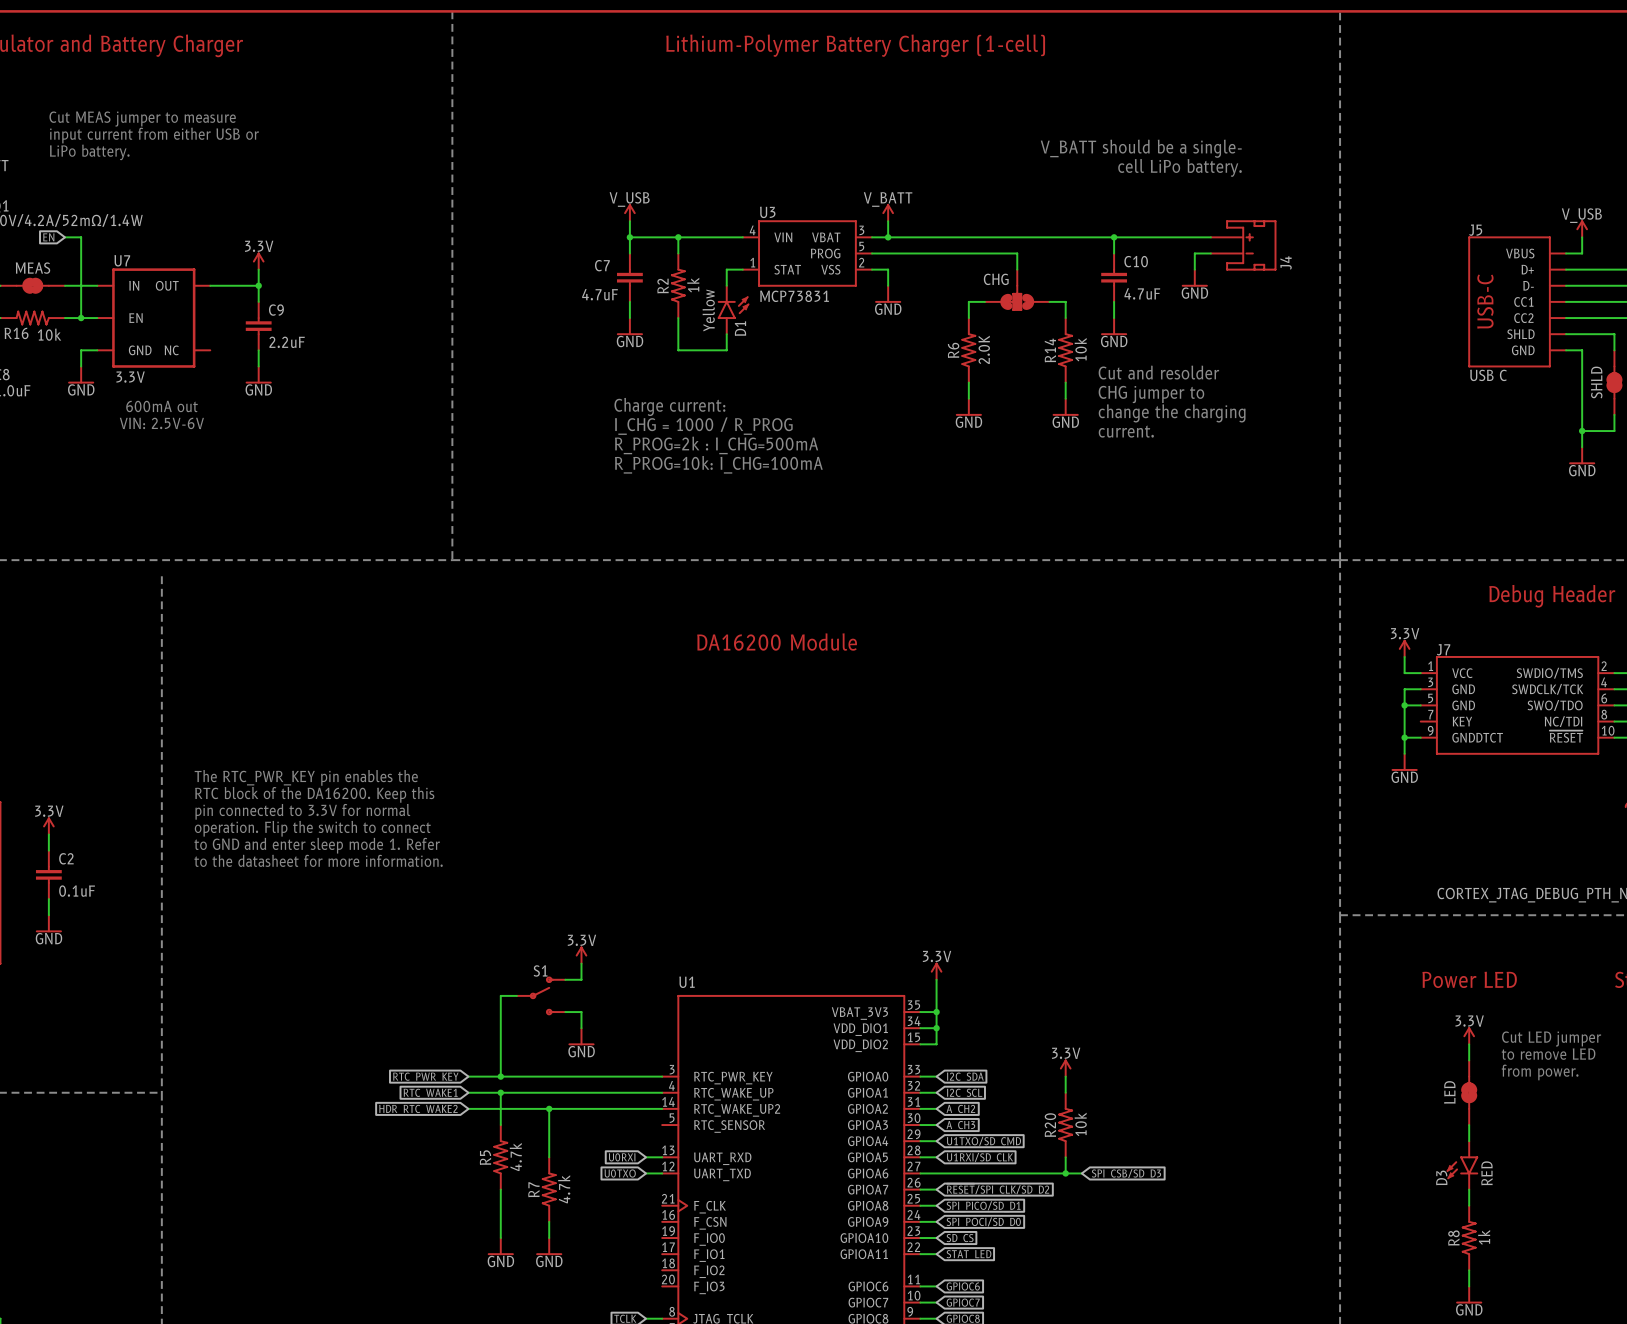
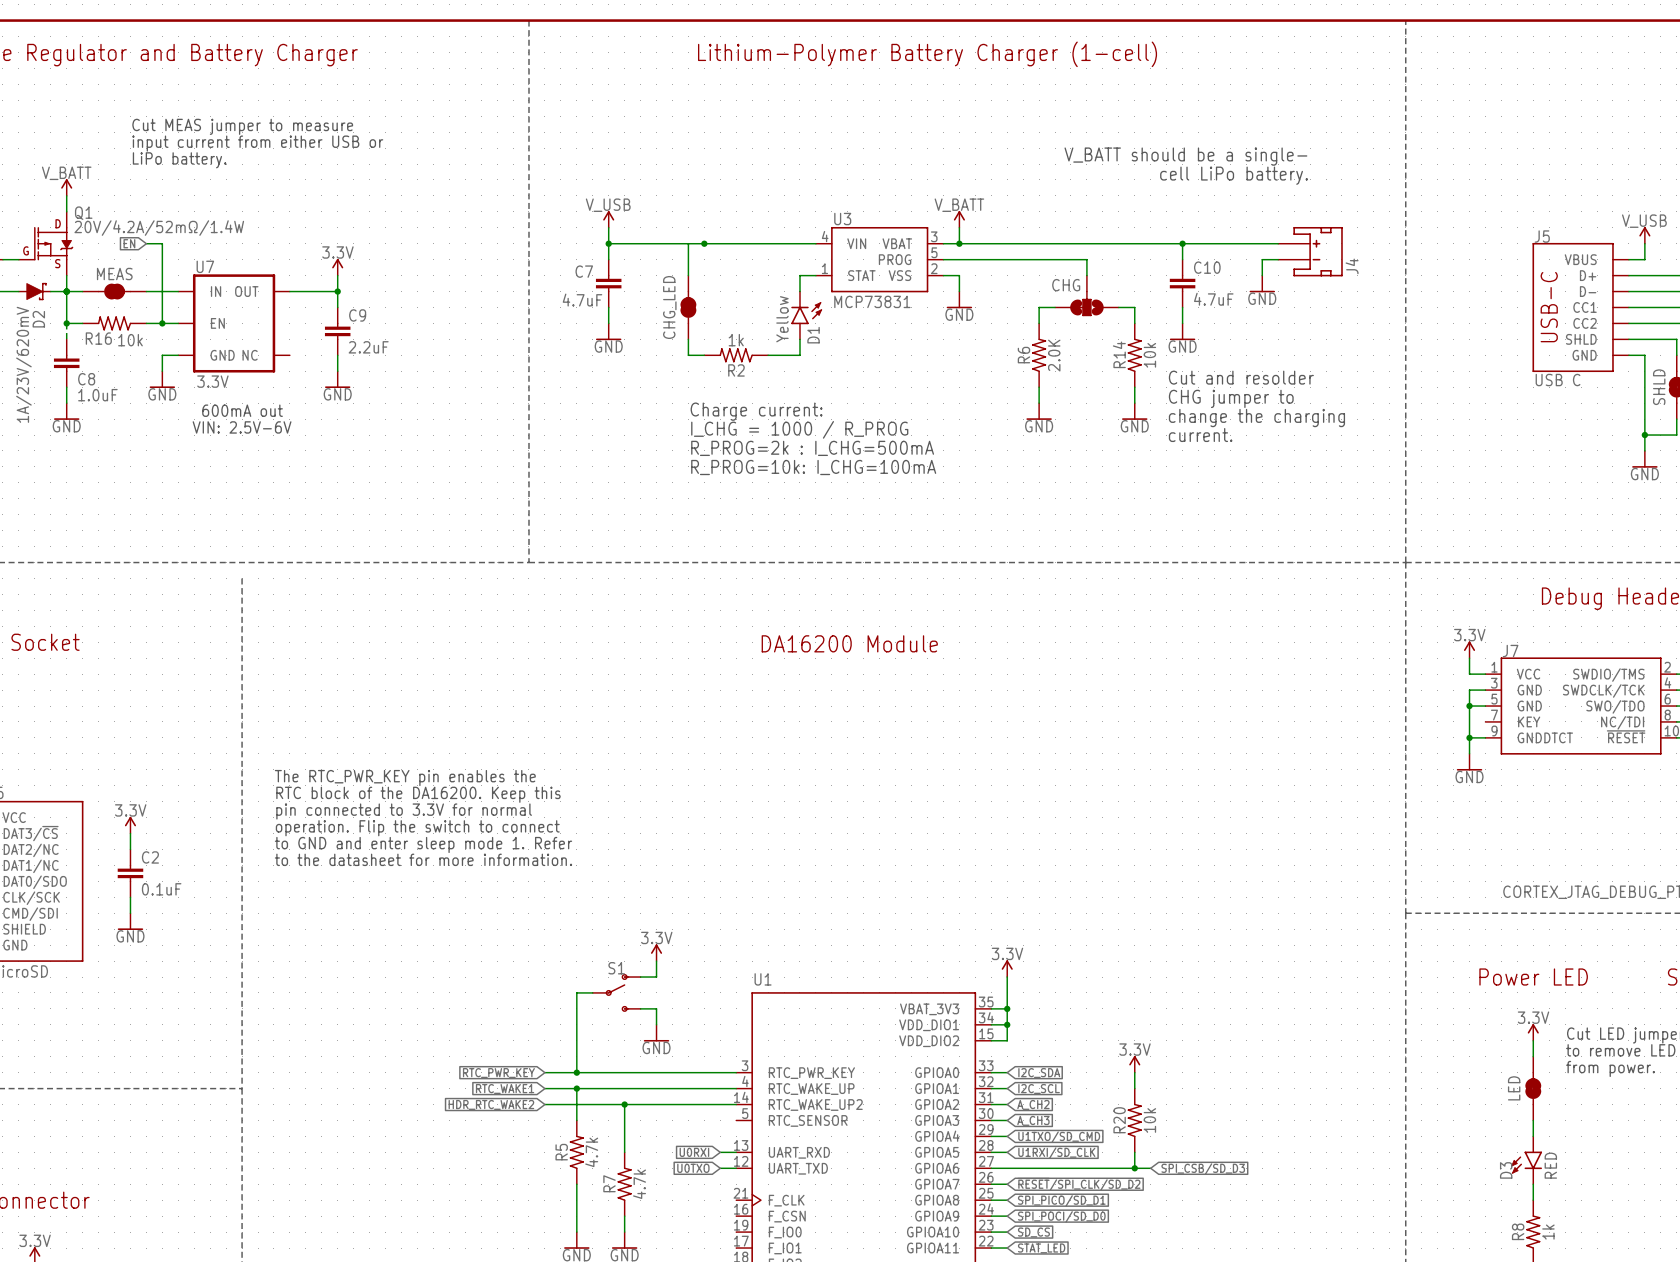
power symbol position: V_USB (629, 212) -> V_USB (608, 219)
wire: (629, 221) (629, 253) -> (608, 227) (608, 259)
wire: none -> (608, 243) (704, 243)
junction: none -> (608, 243)
wire: none -> (688, 243) (688, 275)
wire: (678, 237) (678, 253) -> none
junction: (678, 237) -> none
C7 position: (629, 277) -> (608, 283)
R2 rotation: 0° (678, 285) -> 90° counterclockwise (736, 355)
R2 position: (678, 285) -> (736, 355)
CHG_LED: none -> (688, 307)
wire: (629, 301) (629, 318) -> (608, 307) (608, 323)
wire: (678, 318) (678, 350) (694, 350) -> none
power symbol position: GND (629, 326) -> GND (608, 331)
wire: none -> (688, 339) (688, 355) (704, 355)

